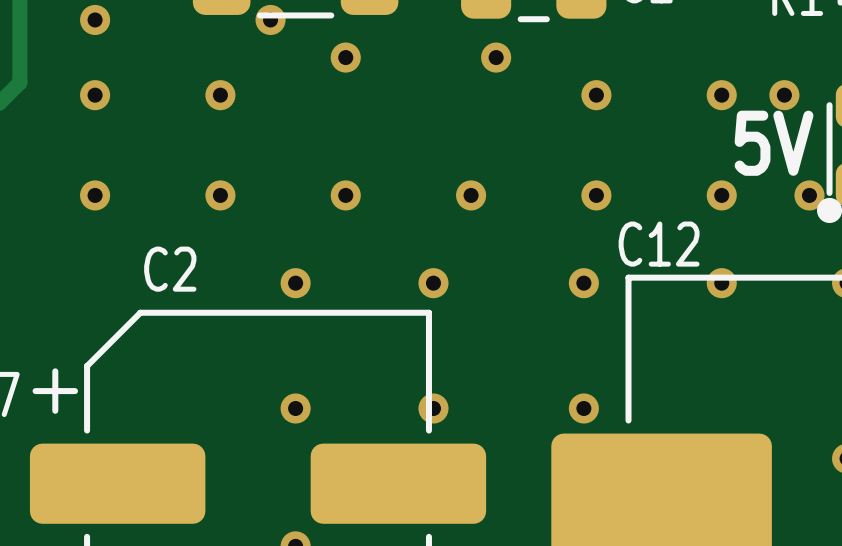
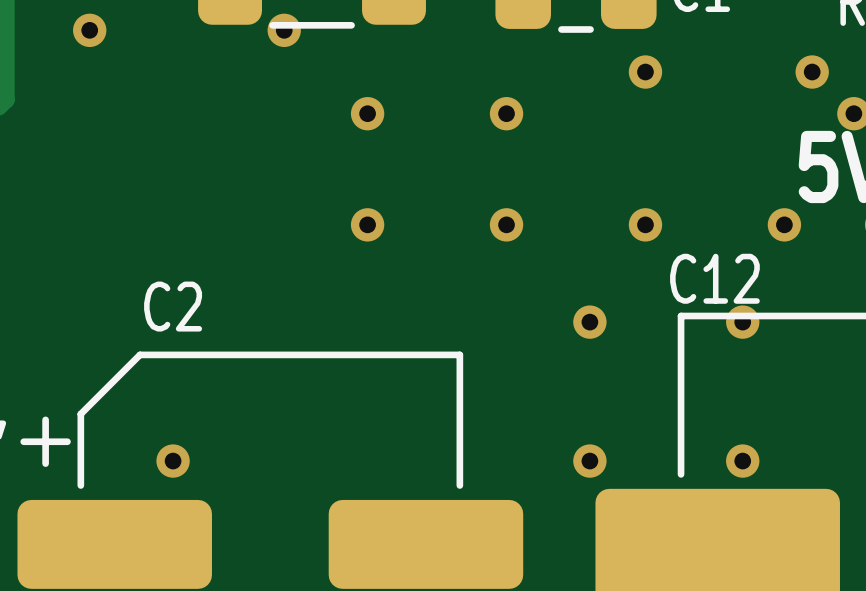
via position: (345, 57) -> (367, 113)
via position: (496, 57) -> (506, 113)
via: (95, 95) -> none
via: (220, 95) -> none
via position: (596, 95) -> (645, 72)
via position: (721, 95) -> (812, 72)
via: (95, 195) -> none
via: (220, 195) -> none
via: (295, 283) -> none
via: (433, 283) -> none
via position: (583, 283) -> (589, 322)
via position: (721, 283) -> (742, 322)
via: none -> (173, 461)
via: (295, 408) -> none
via: (433, 408) -> none
via position: (583, 408) -> (589, 461)
via: none -> (742, 461)

